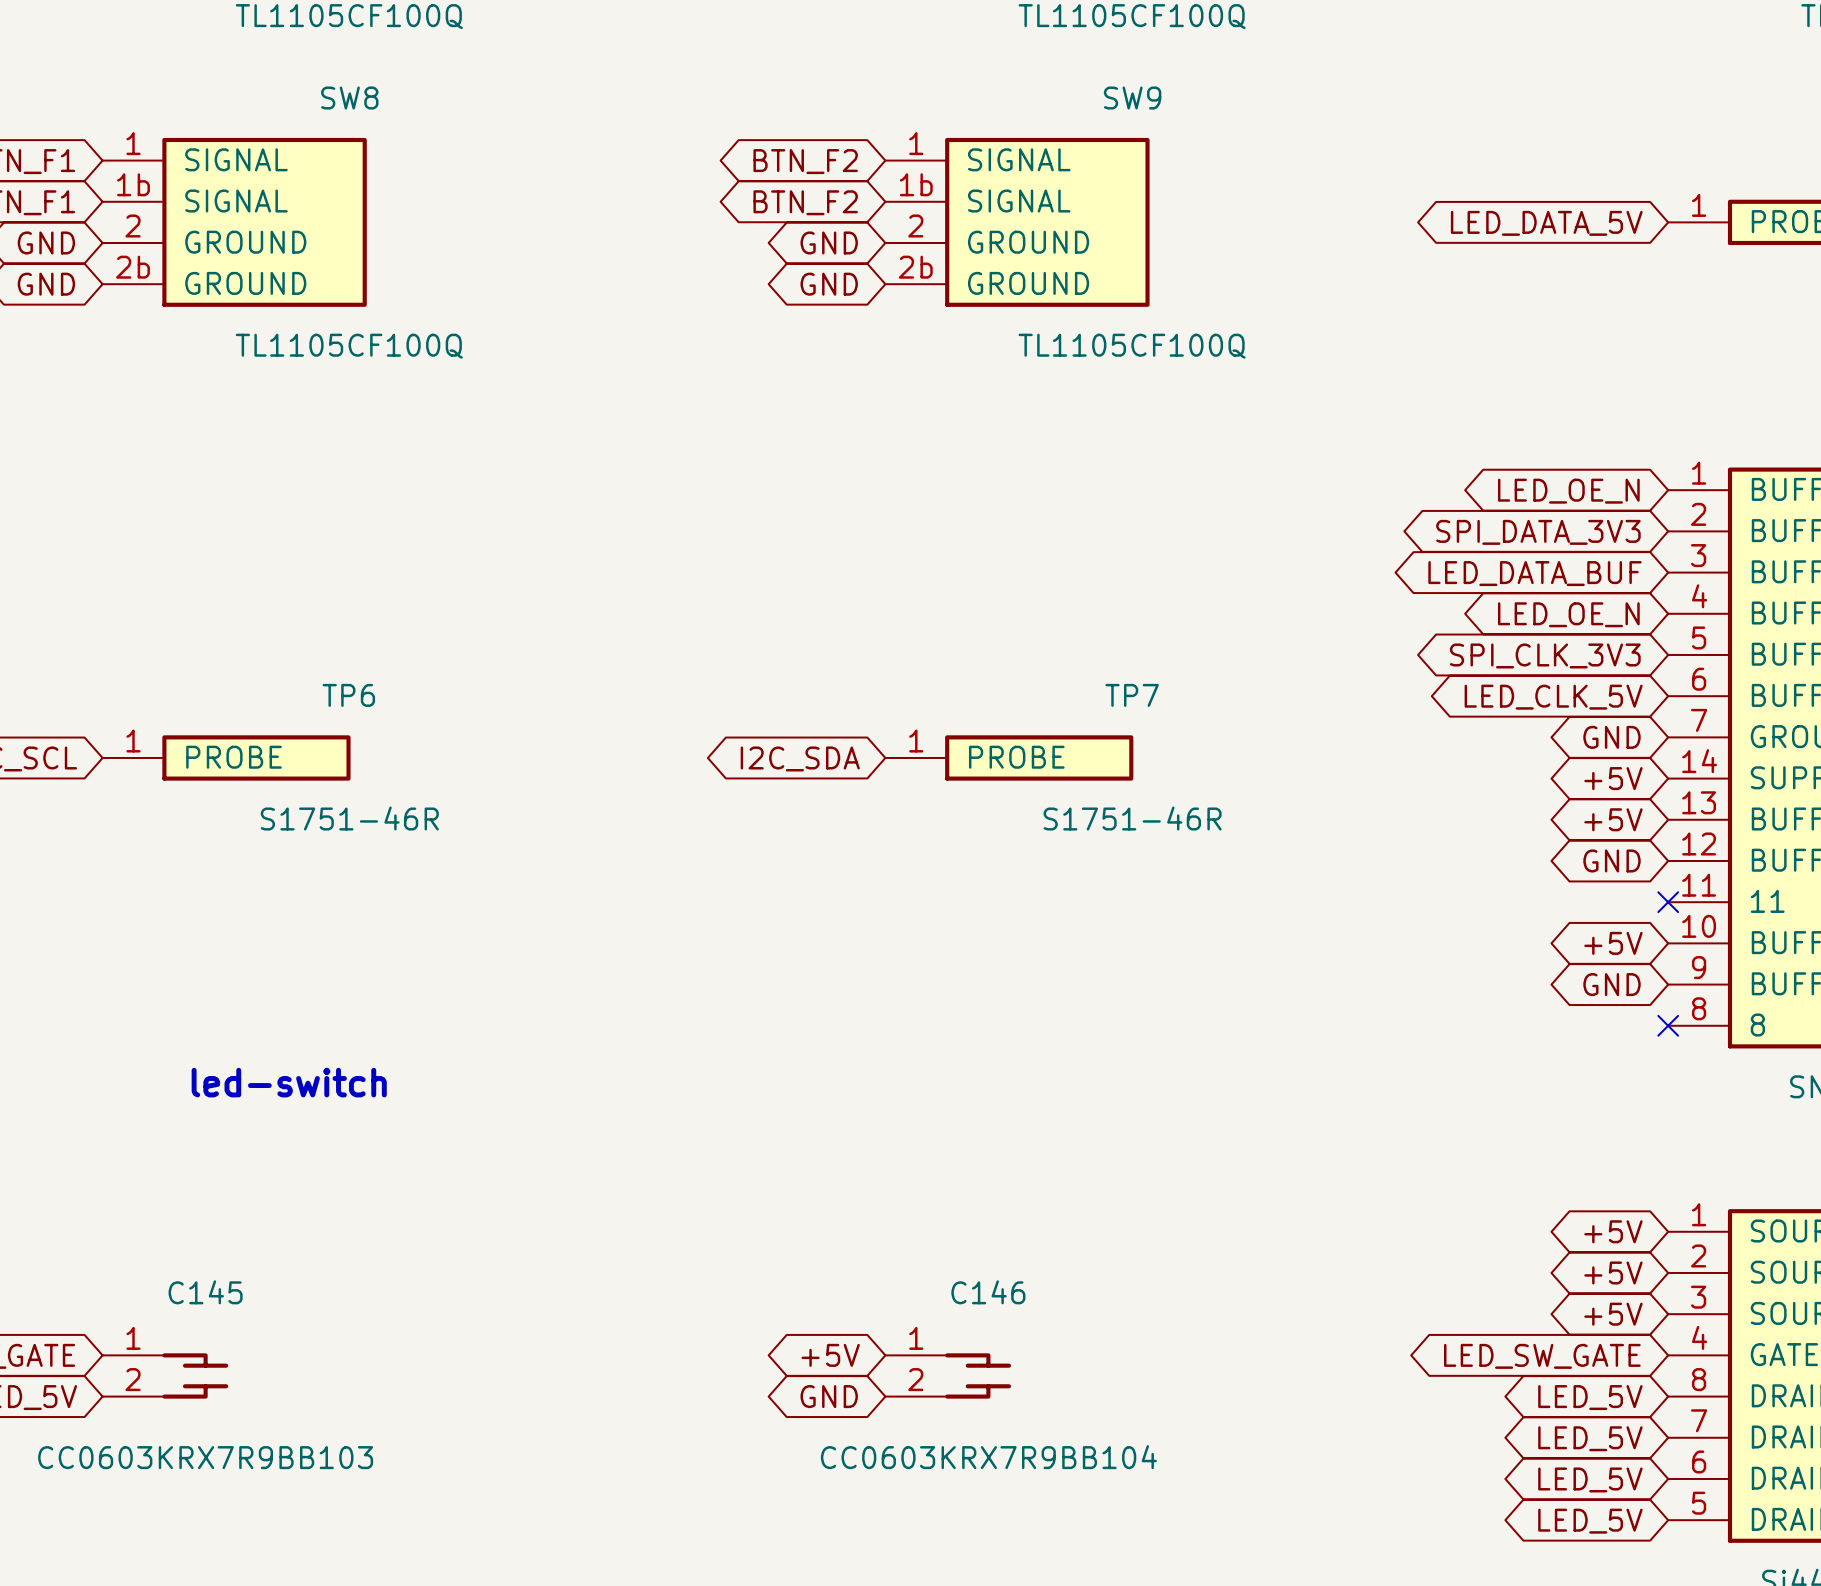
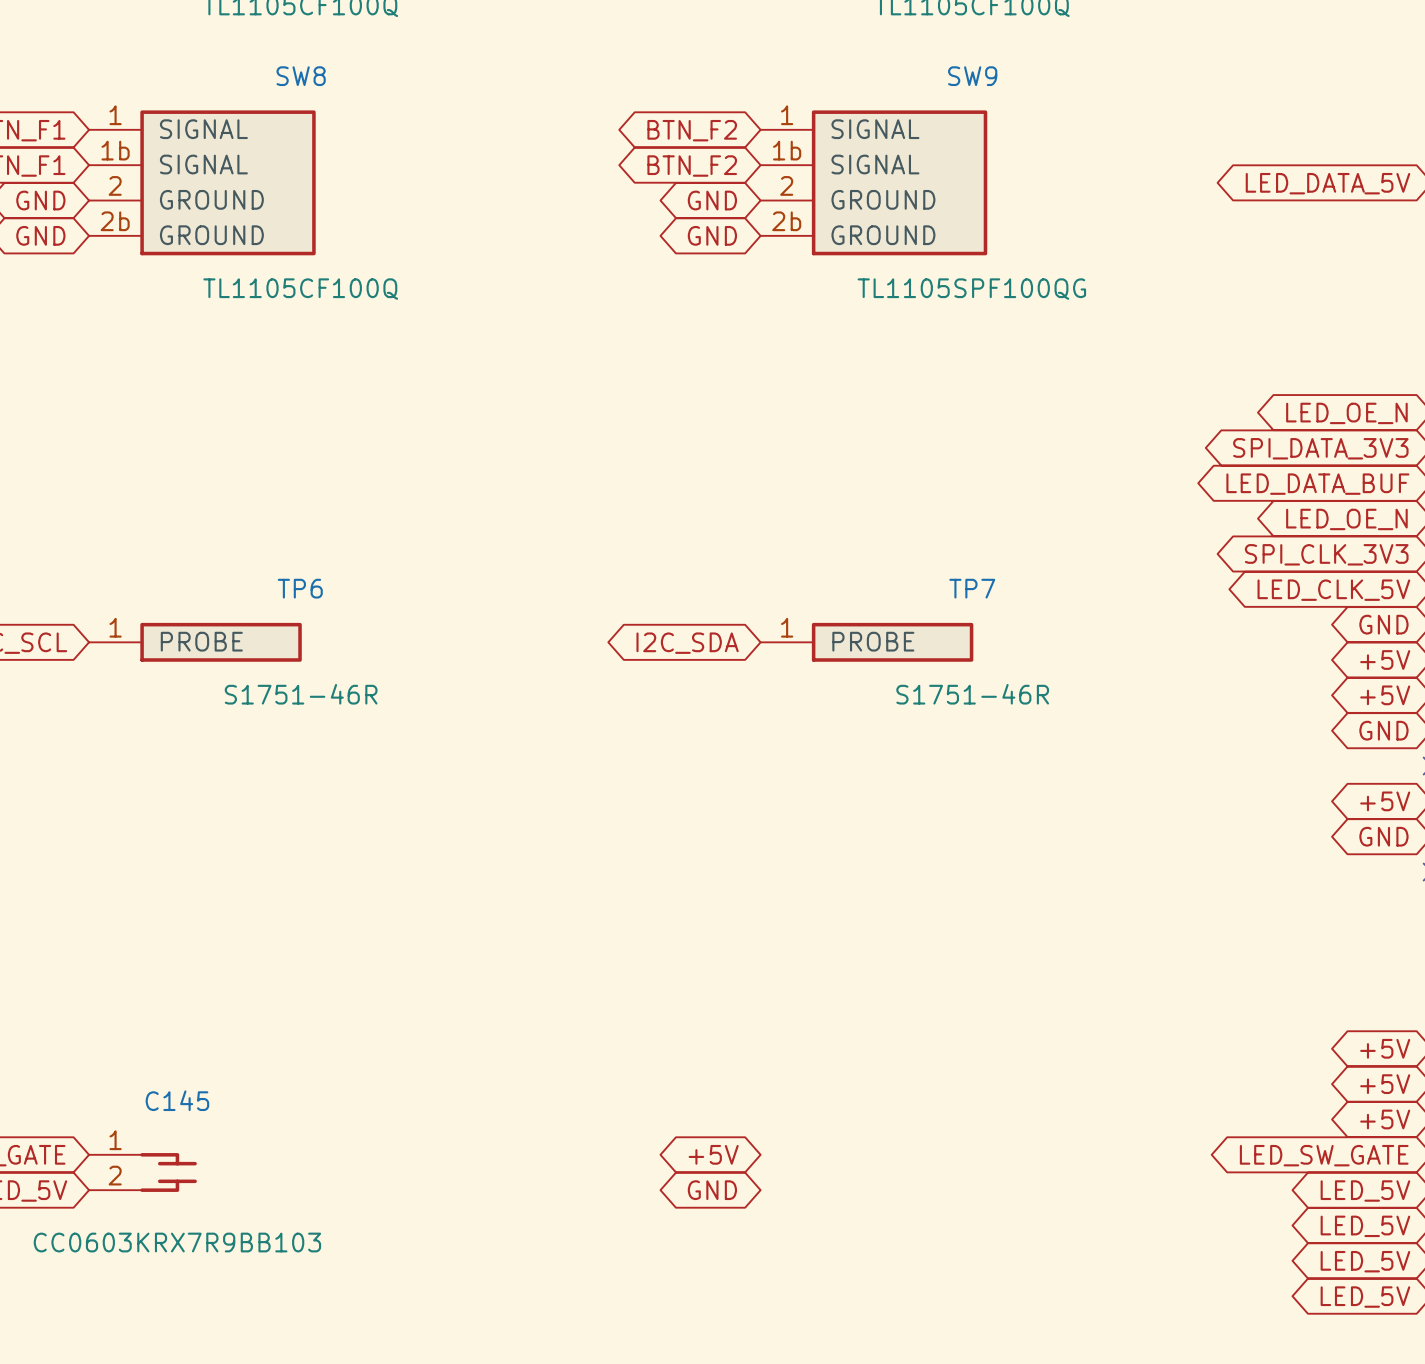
SW9 value: TL1105CF100Q (1132, 346) -> TL1105SPF100QG (971, 289)
text: led-switch (289, 1082) -> none
C146: CC0603KRX7R9BB104 (948, 1375) -> none

